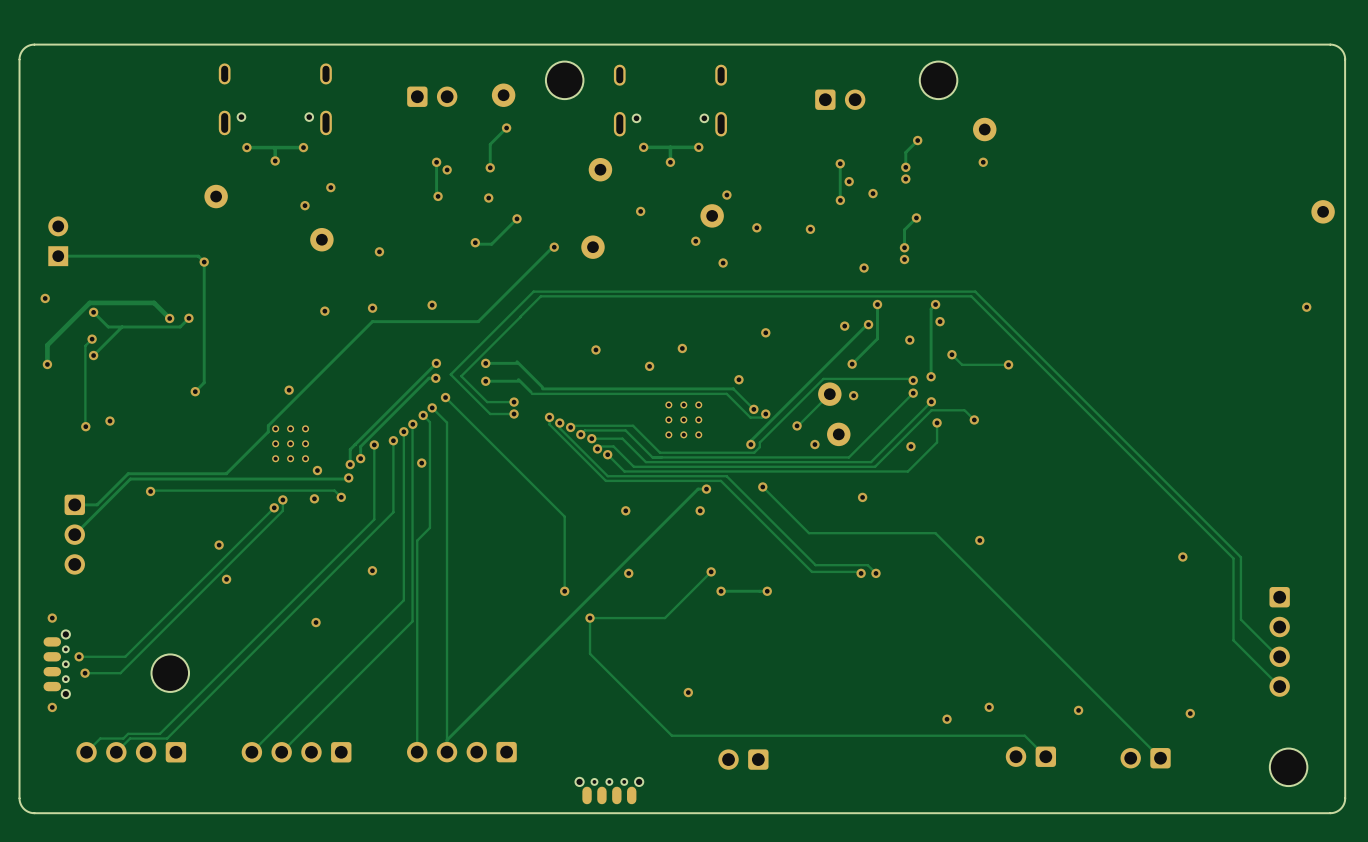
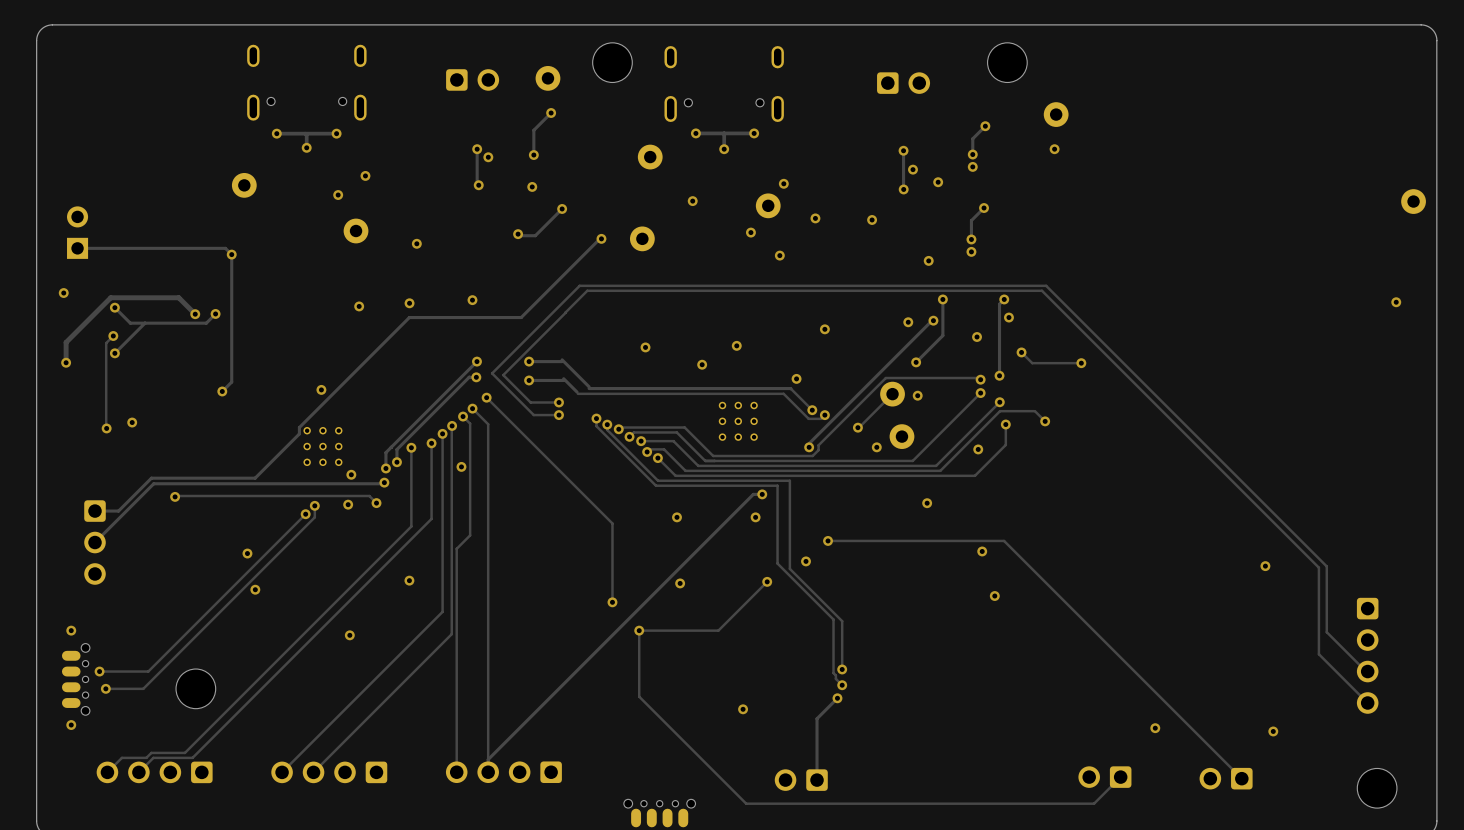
track: (726, 476) (815, 565) (867, 565) (876, 573) -> (783, 480) (789, 480) (789, 568) (842, 621) (842, 669)
track: (720, 480) (811, 571) (861, 573) -> (777, 485) (777, 563) (833, 619) (833, 673) (842, 685)
track: (762, 486) (808, 533) -> (828, 540) (870, 540)
via: (762, 486) -> none
via: none -> (828, 540)
via: (979, 540) -> none
via: none -> (982, 551)
via: none -> (806, 561)
via: (861, 573) -> none
via: (876, 573) -> none
via: none -> (994, 596)
via: (721, 591) -> none
track: (767, 591) (721, 591) -> none
via: (767, 591) -> none
track: (590, 653) (671, 735) (1024, 735) (1045, 756) -> (639, 668) (639, 696) (746, 803) (1094, 803) (1120, 777)
via: none -> (842, 669)
via: none -> (842, 685)
track: none -> (837, 698) (817, 718) (817, 780)
via: none -> (837, 698)
via: (989, 707) -> none
via: (947, 719) -> none

